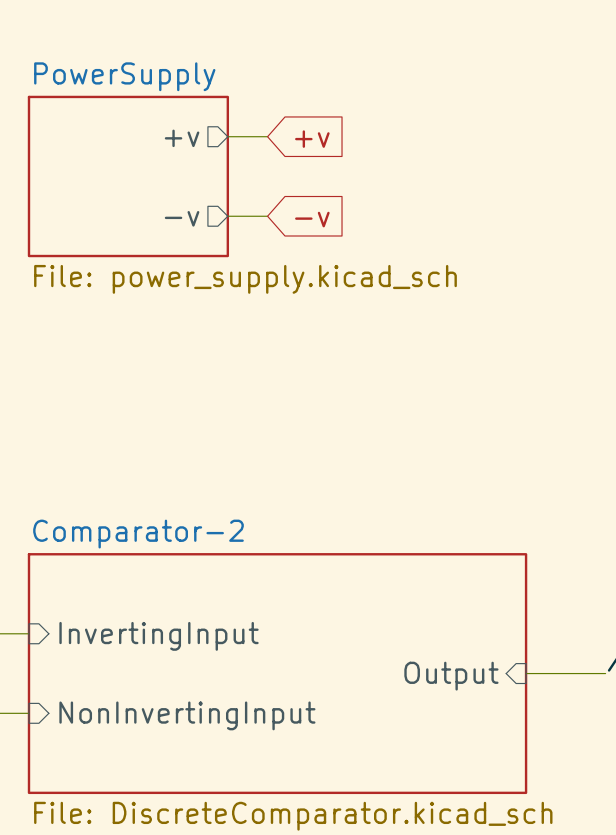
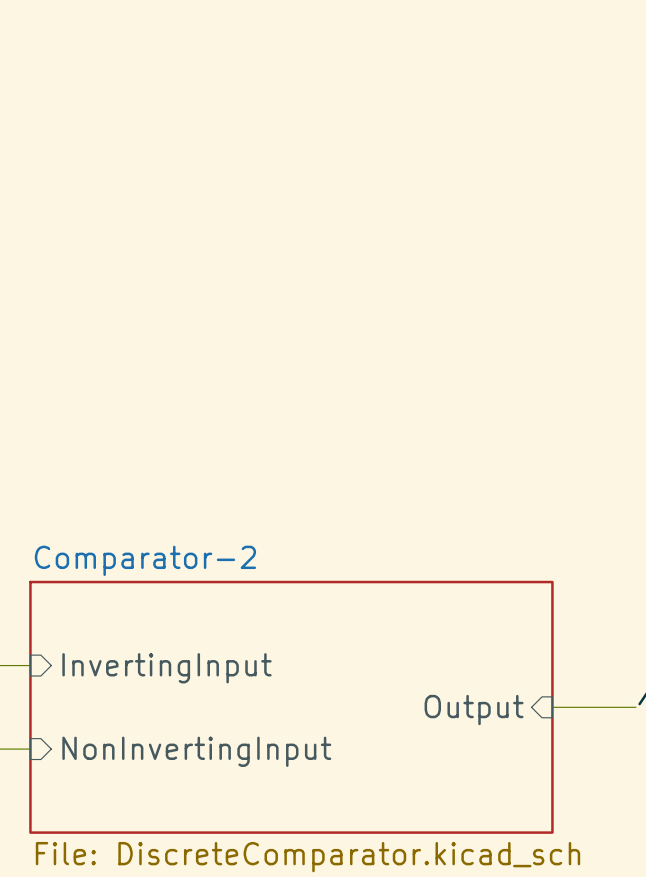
wire: (227, 136) (267, 136) -> none
sheet pin: +v (182, 138) -> none
global label: +v (312, 139) -> none
sheet PowerSupply: File: power_supply.kicad_sch (128, 176) -> none
wire: (227, 216) (267, 216) -> none
sheet pin: -v (182, 218) -> none
global label: -v (312, 219) -> none

